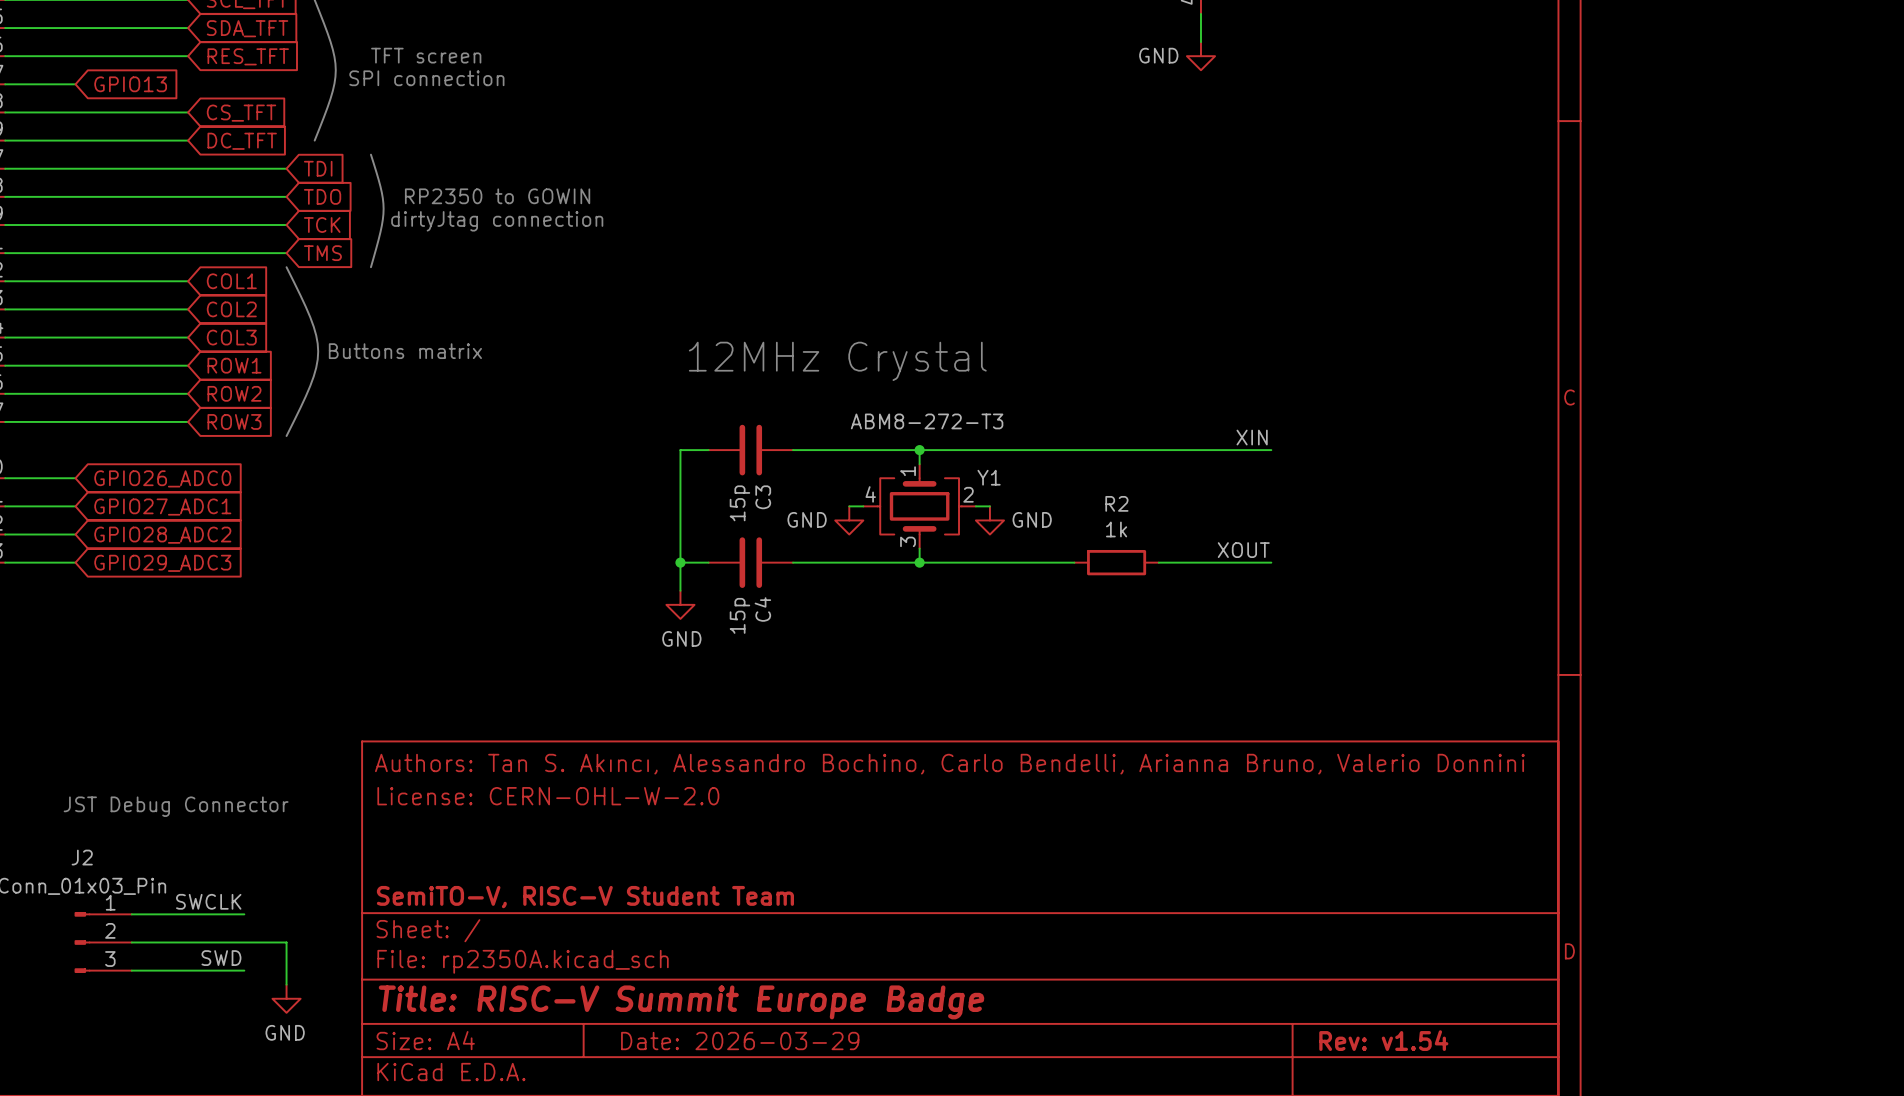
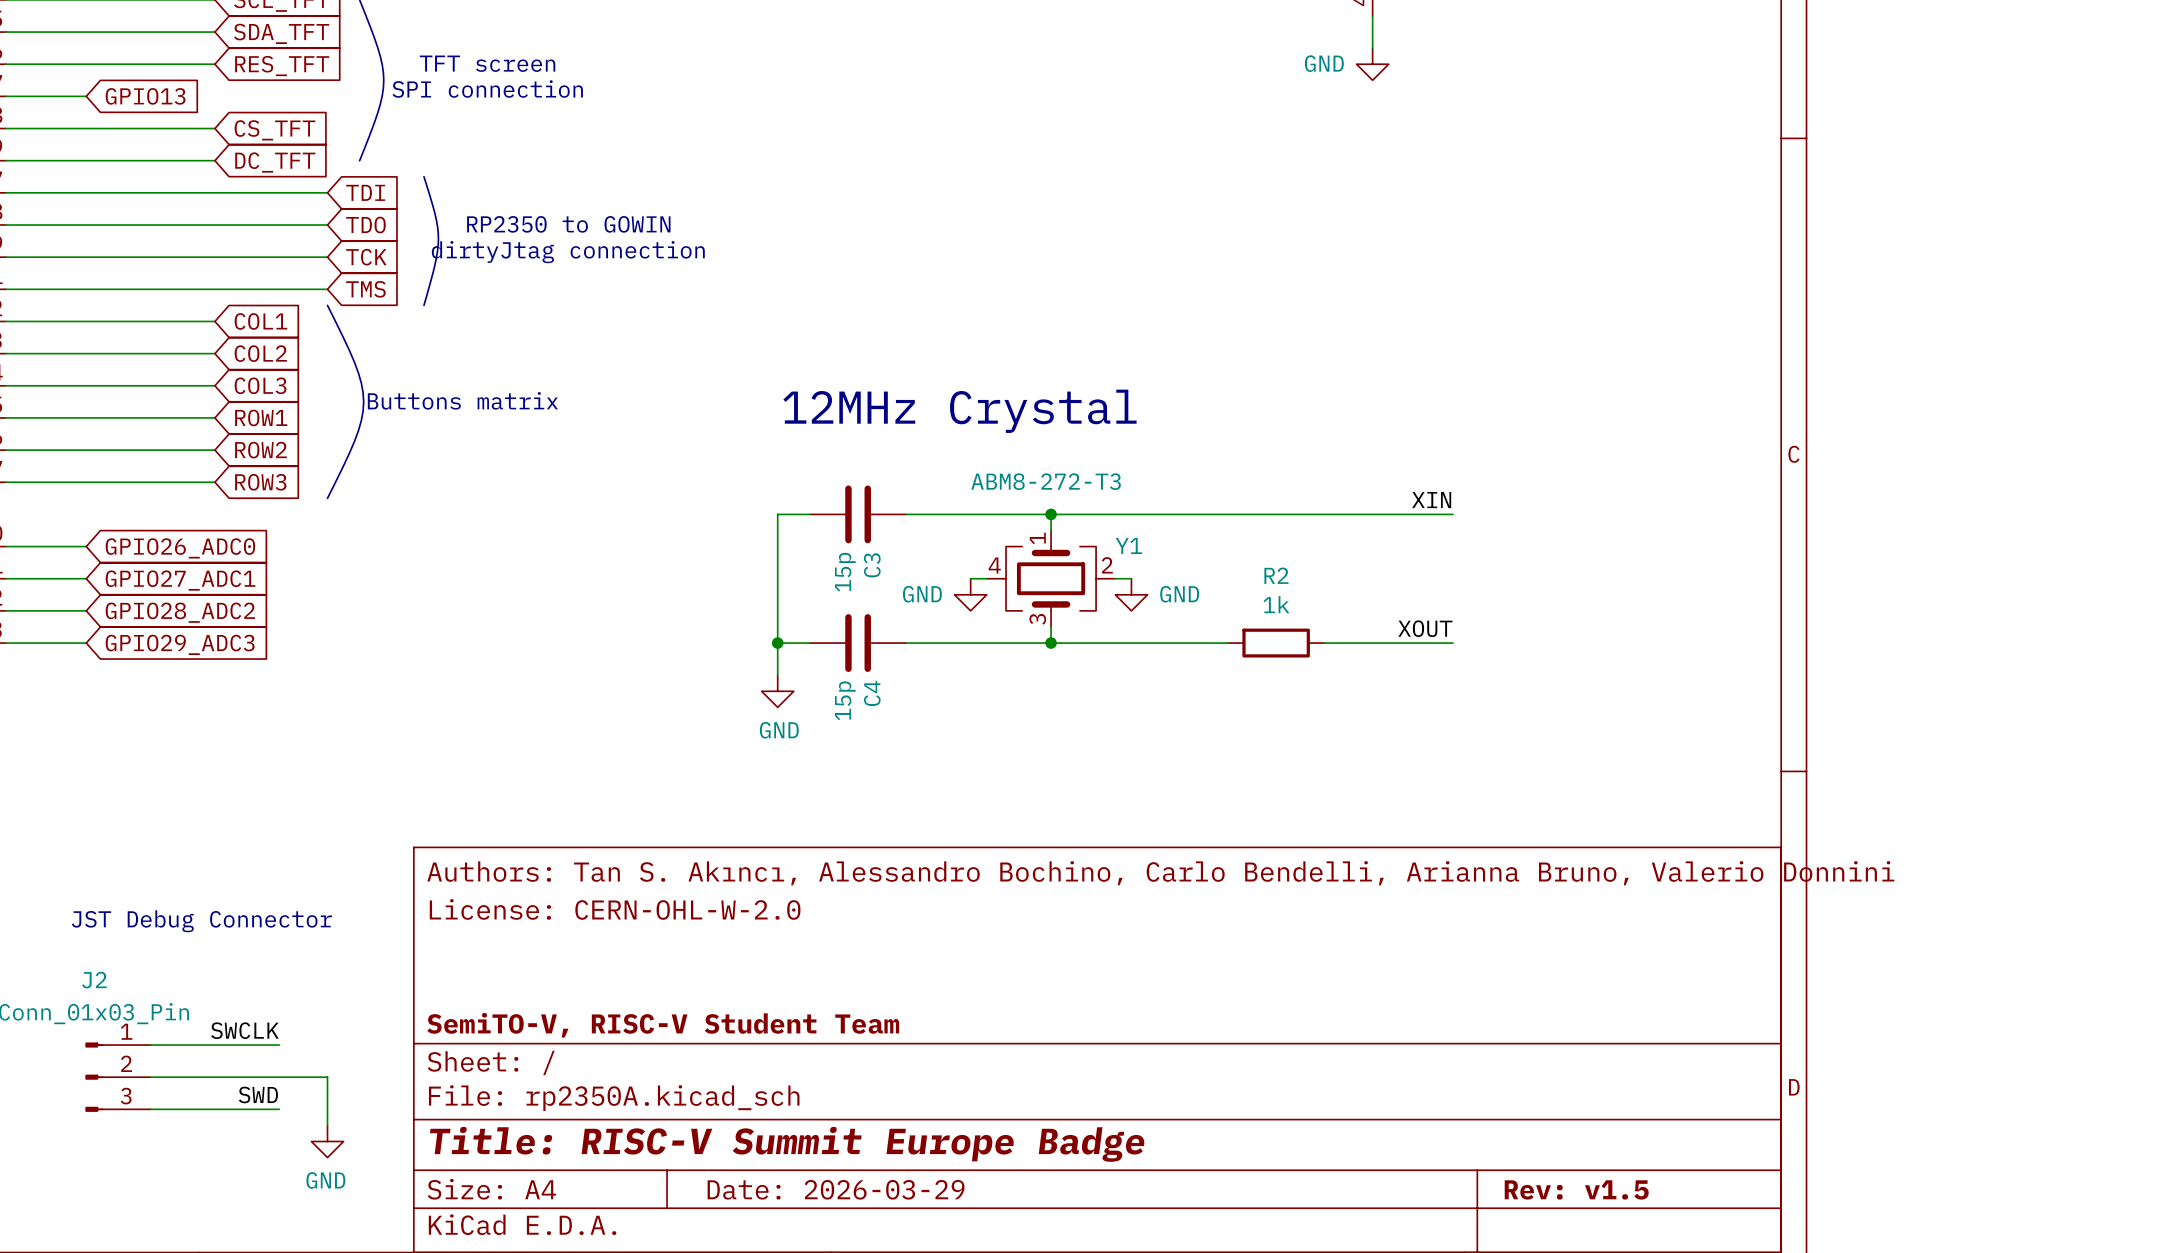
title block: Rev: v1.54 (1383, 1040) -> Rev: v1.5 (1576, 1189)

